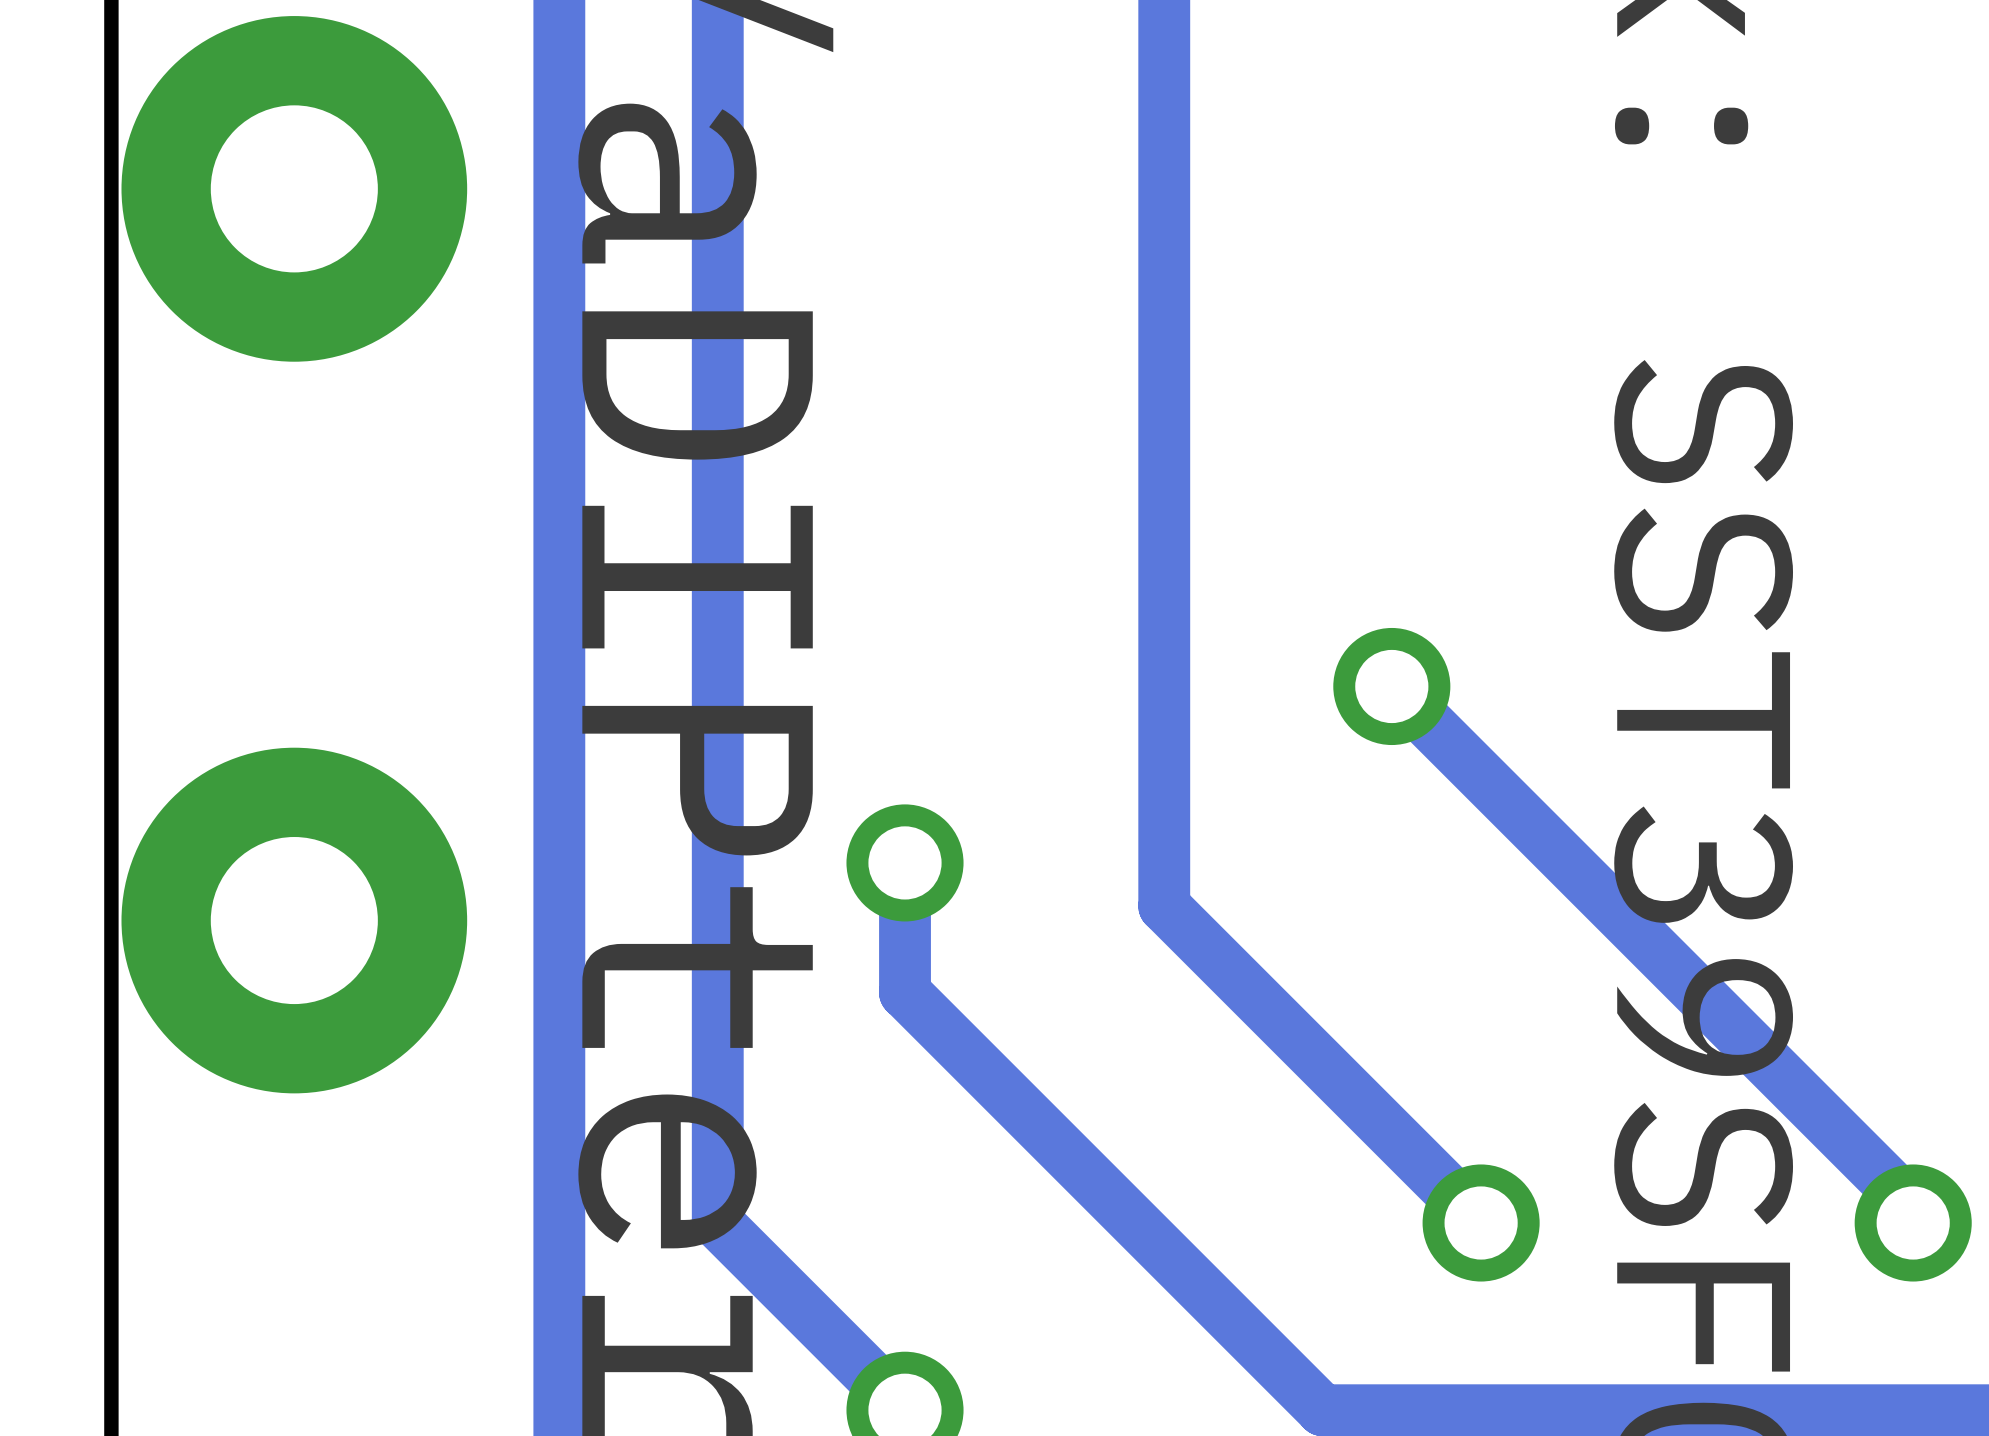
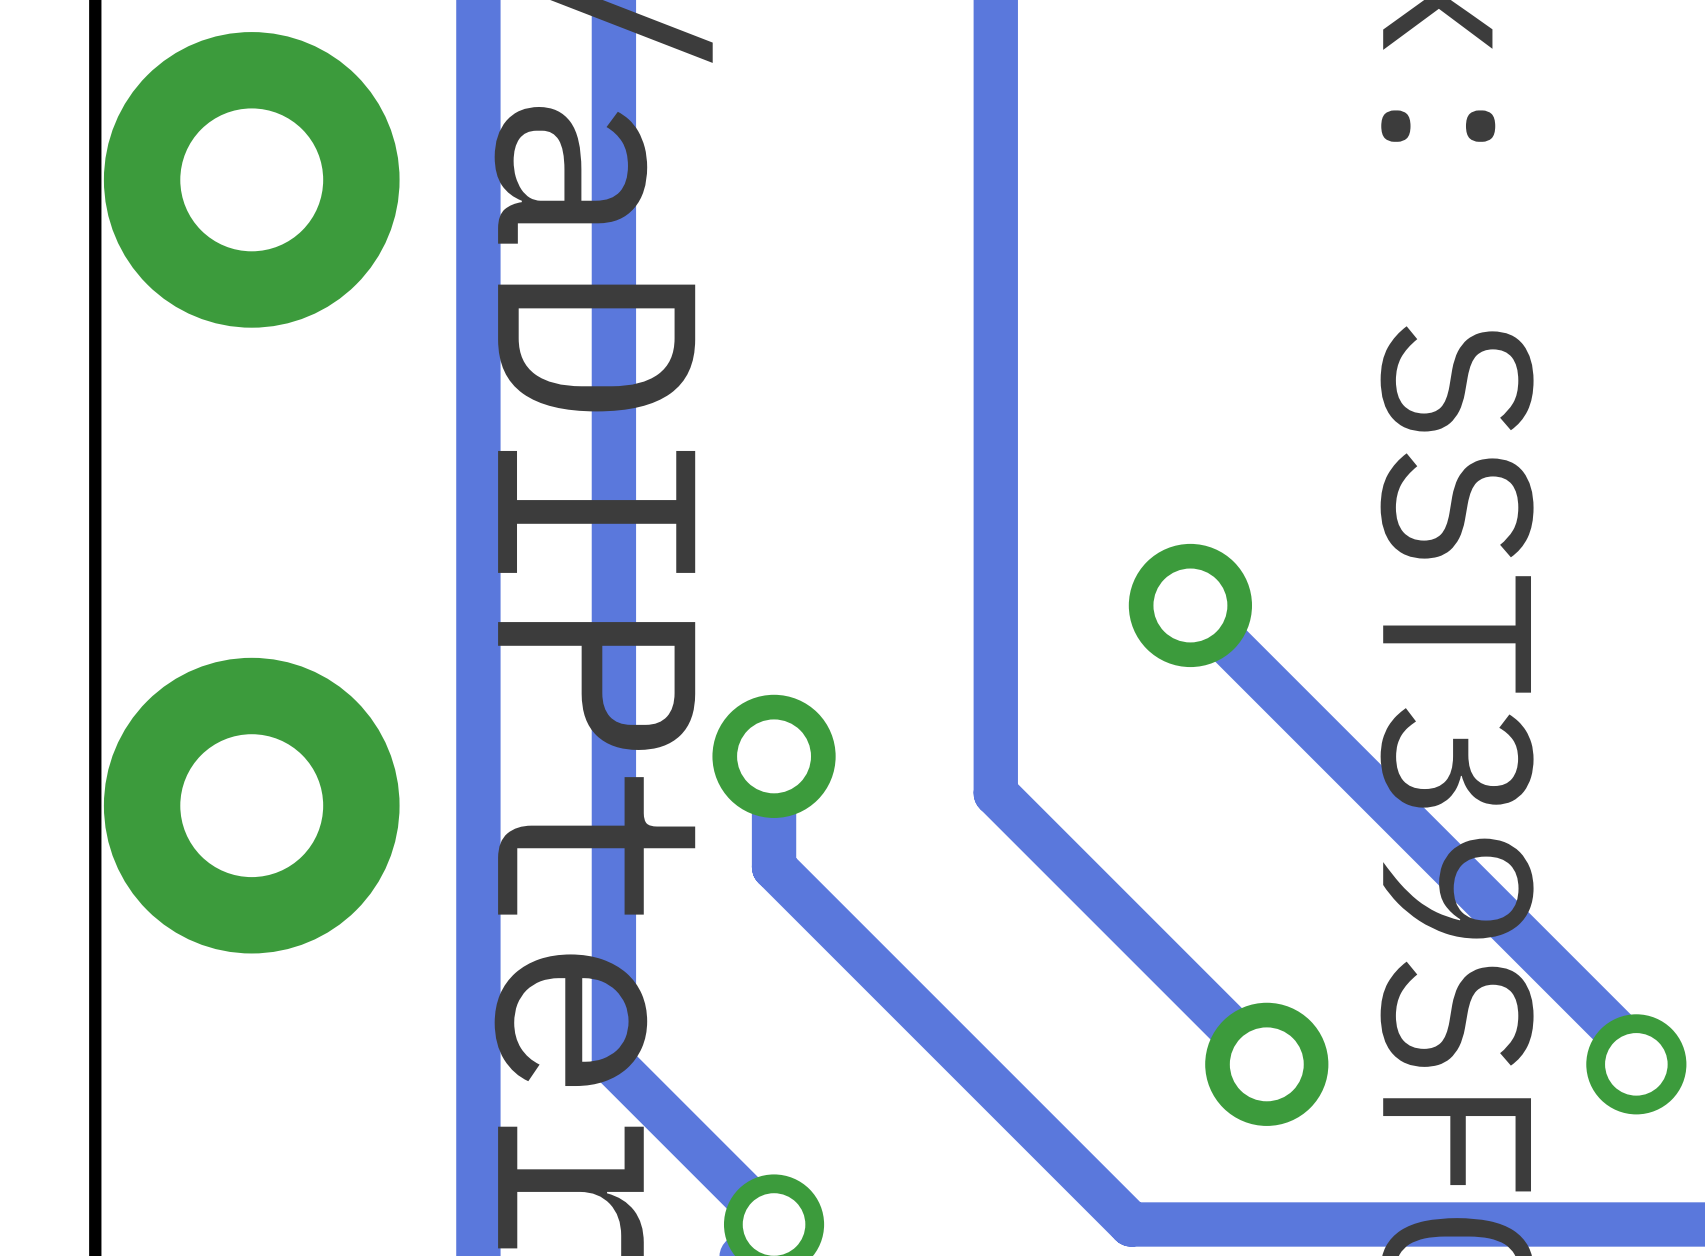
via size: [1333, 627, 1451, 746] -> [1128, 543, 1253, 668]
via size: [846, 804, 964, 922] -> [712, 694, 836, 818]
via size: [1422, 1164, 1540, 1282] -> [1205, 1002, 1329, 1126]

